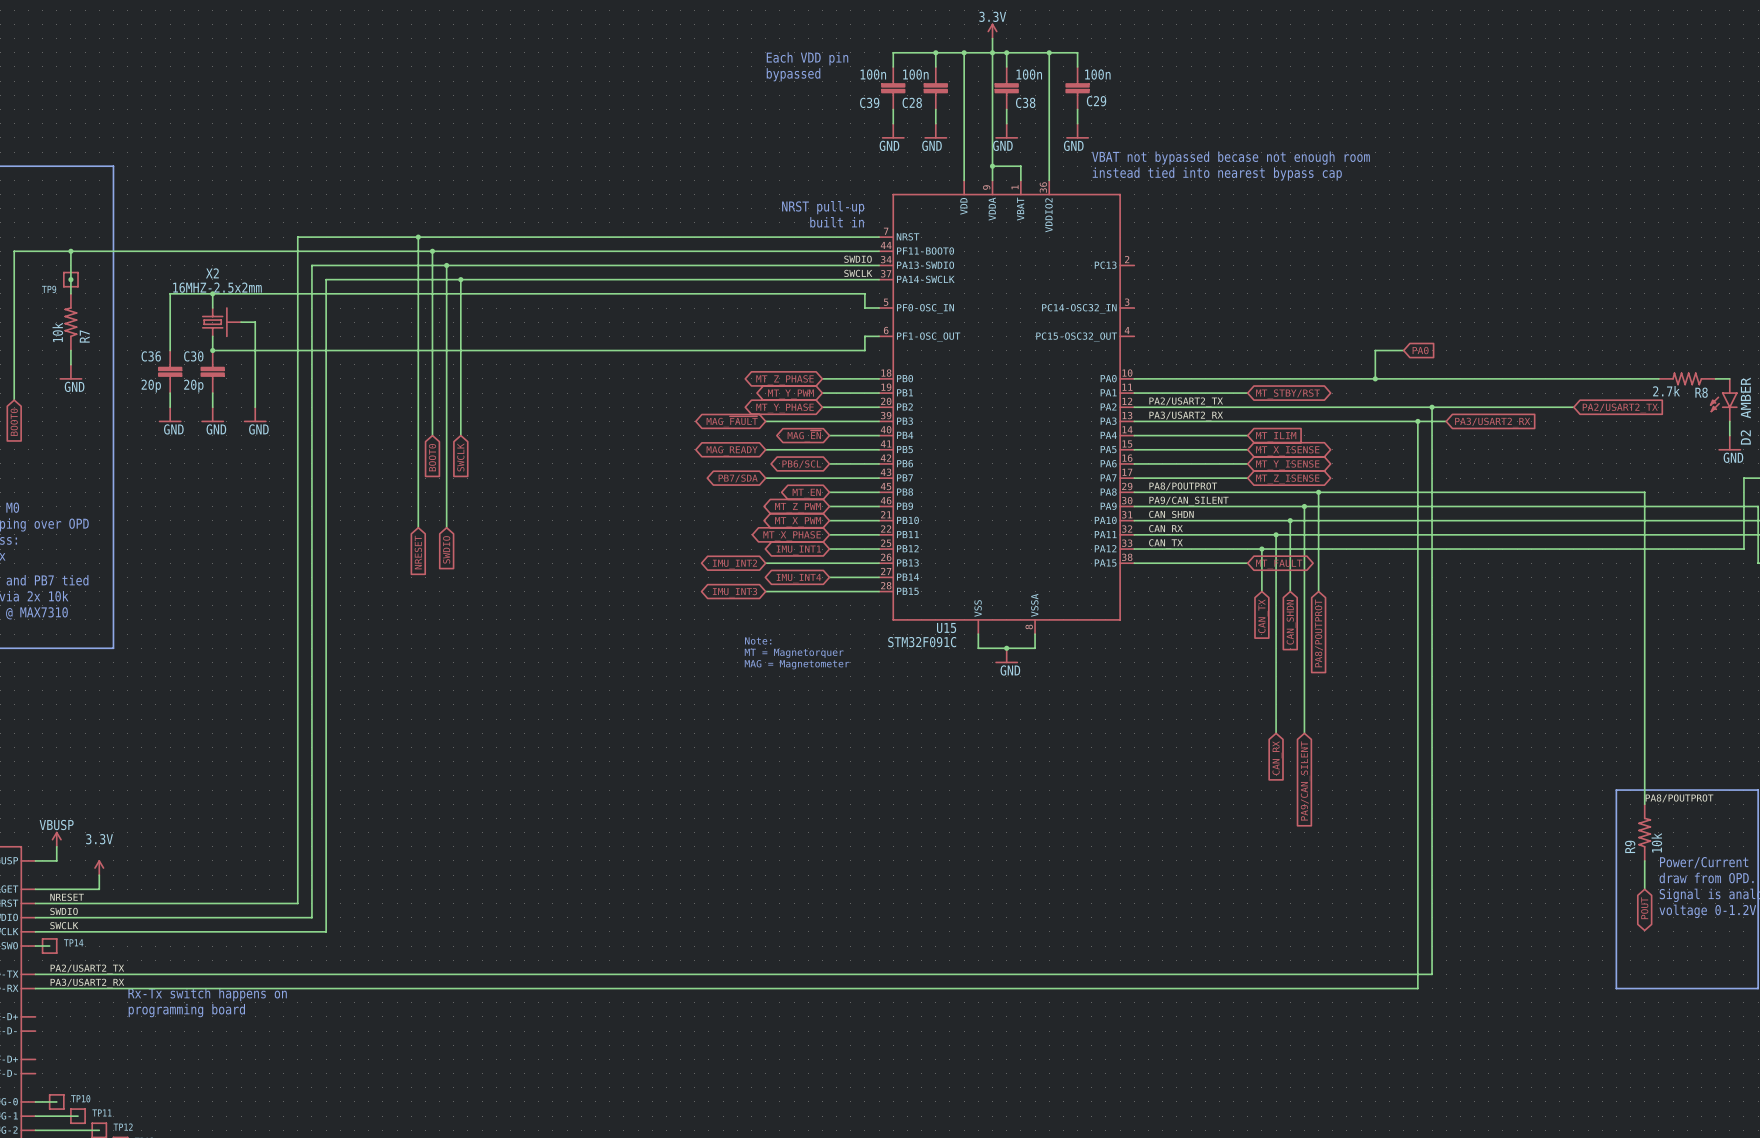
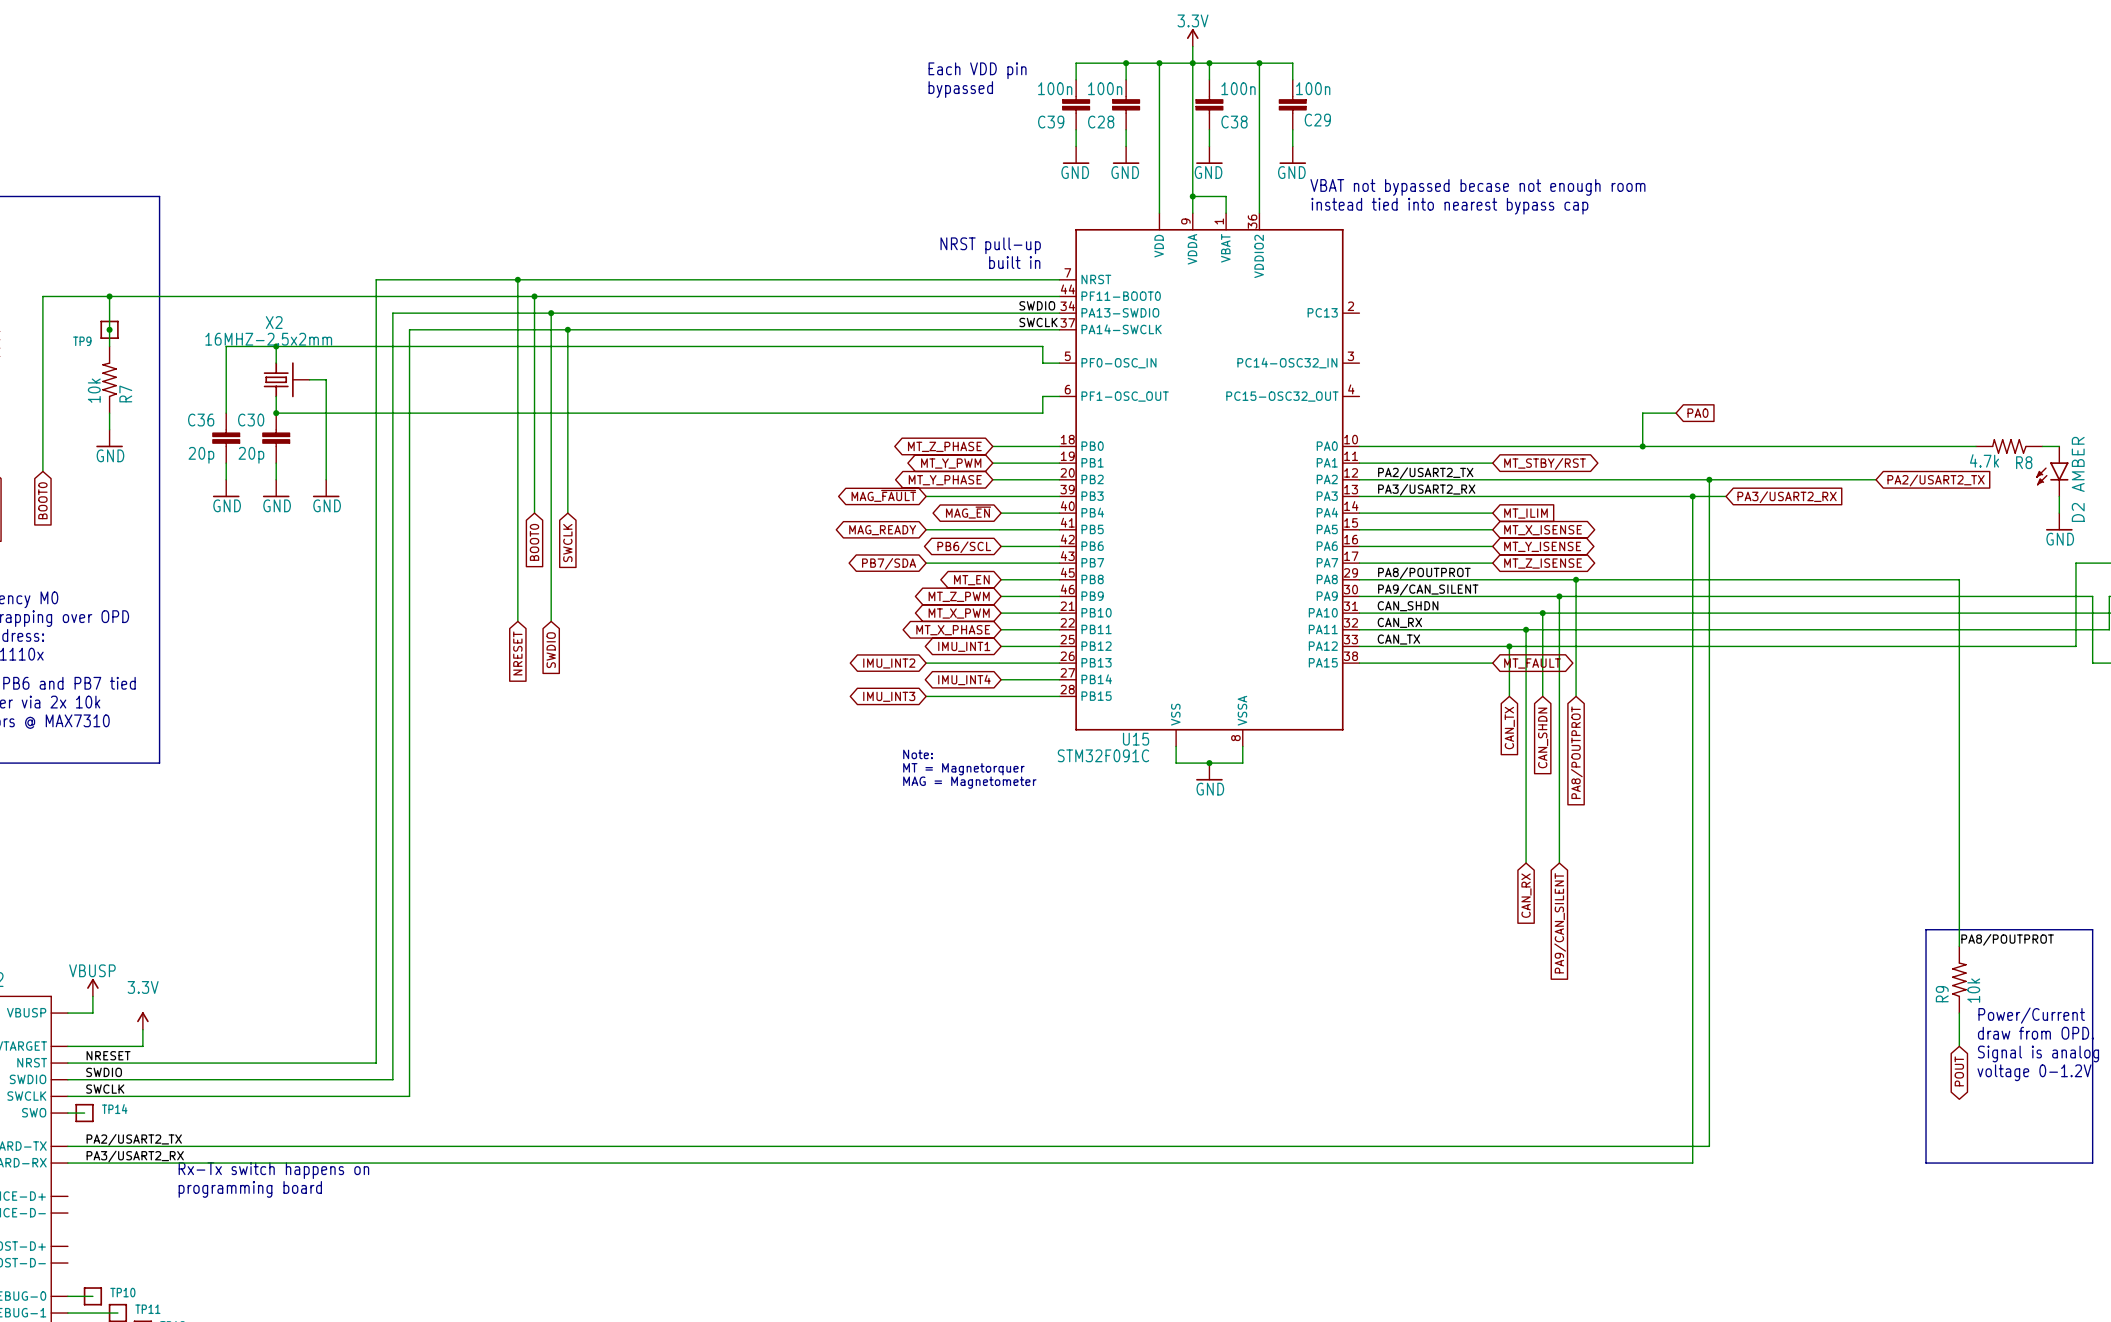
R8 value: 2.7k (1666, 391) -> 4.7k (1984, 460)

